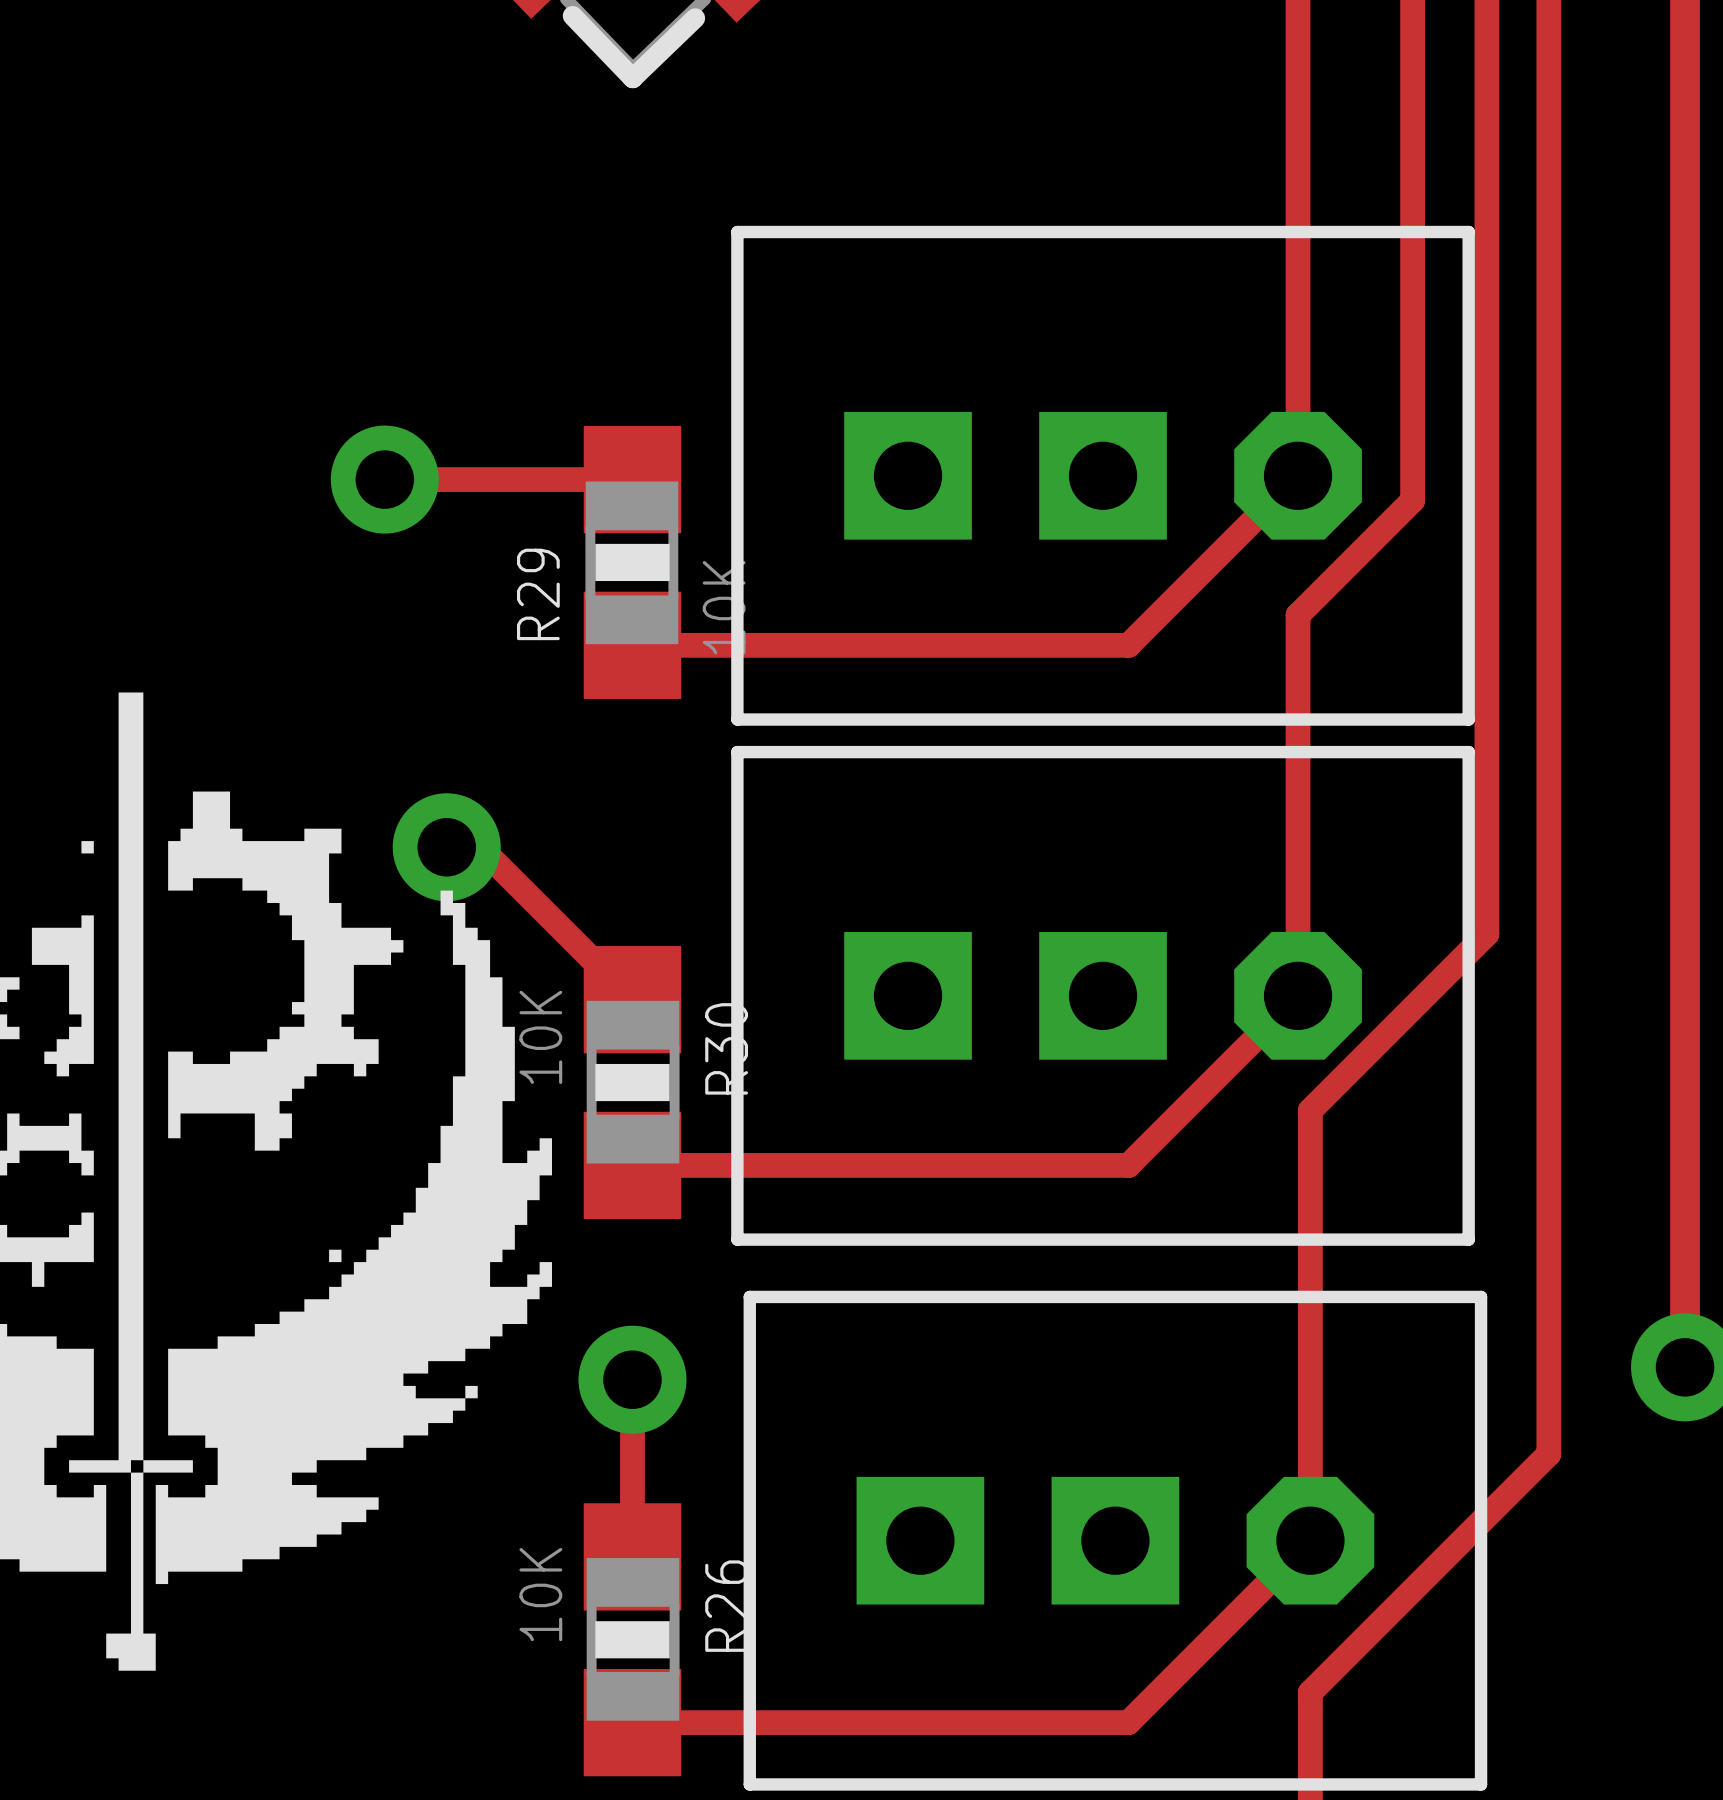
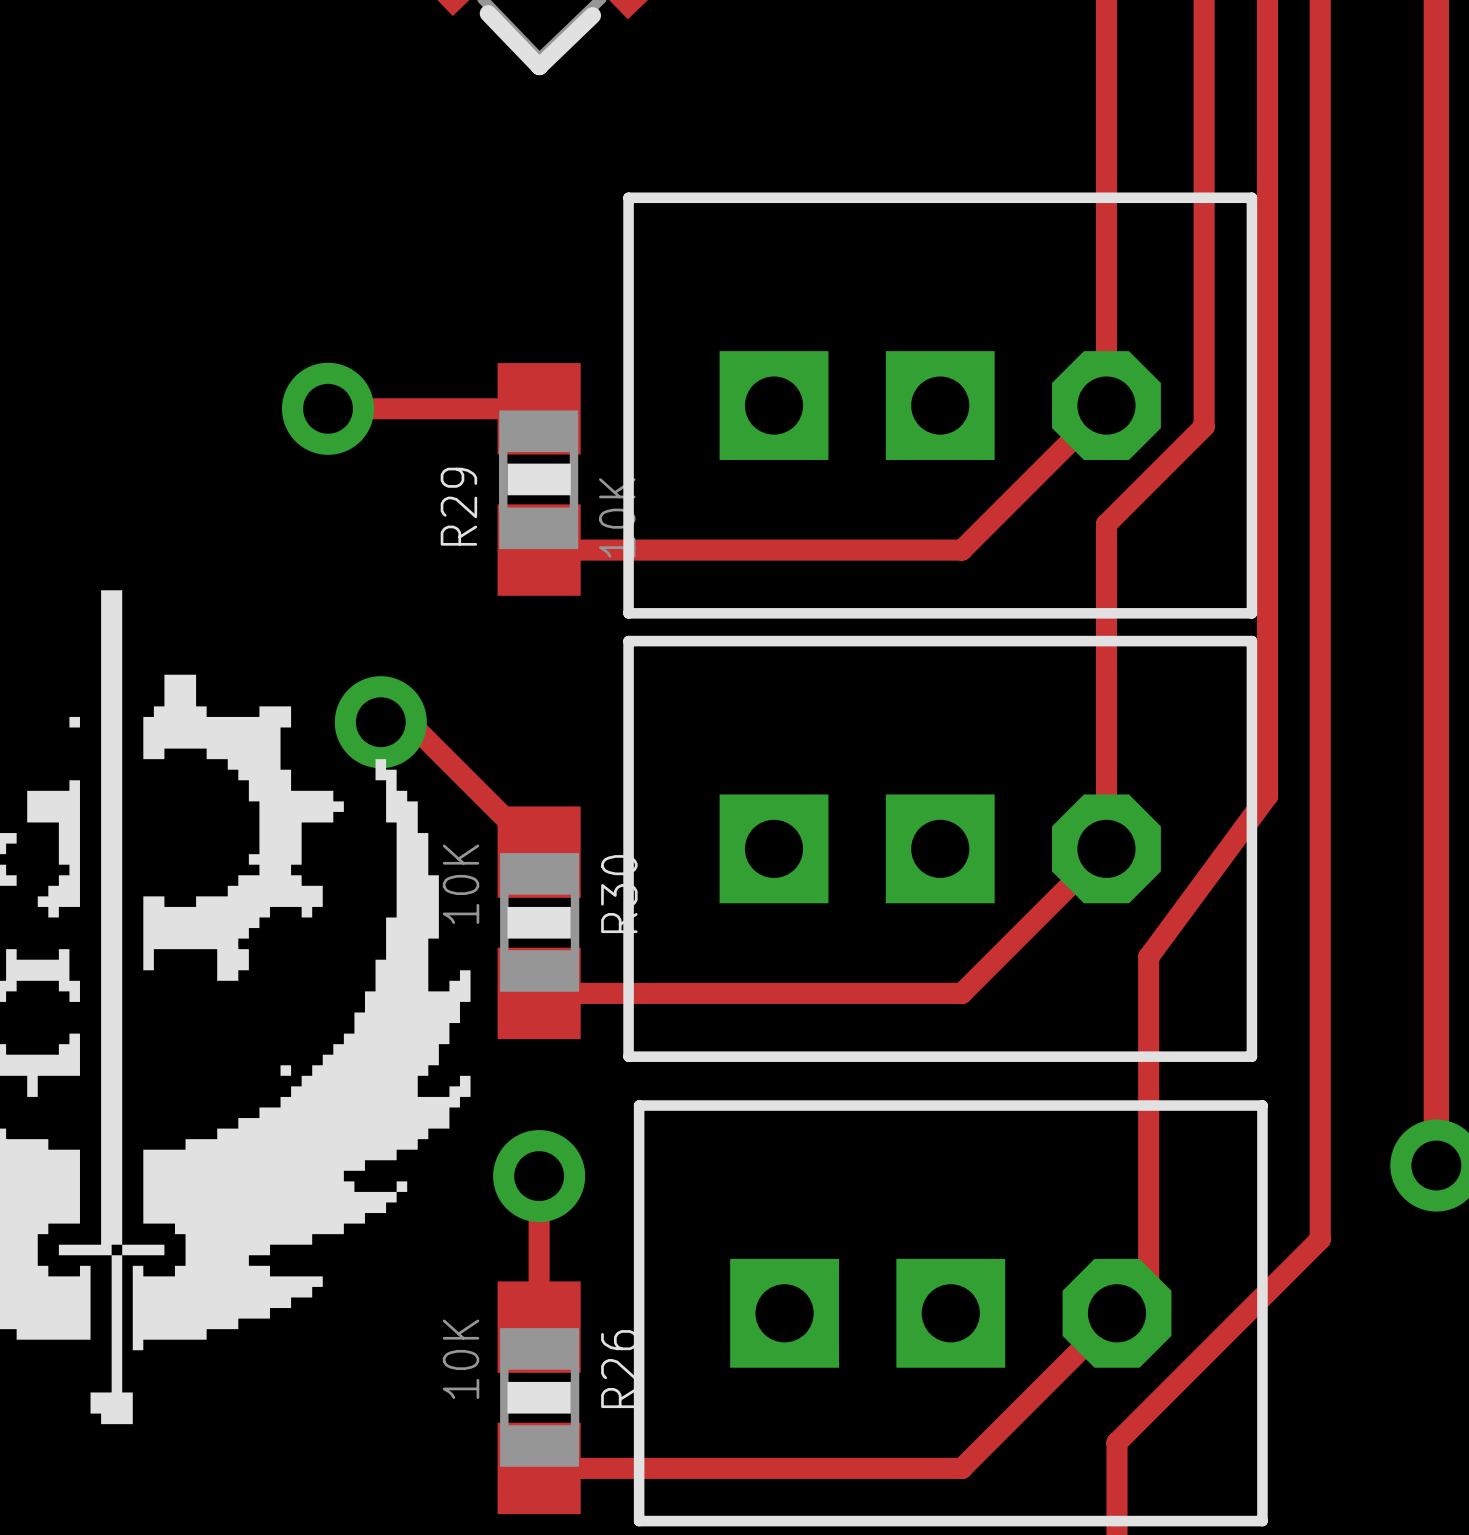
track: (1486, 933) (1310, 1110) (1310, 1540) -> (1267, 796) (1148, 957) (1148, 1281) (1117, 1313)

